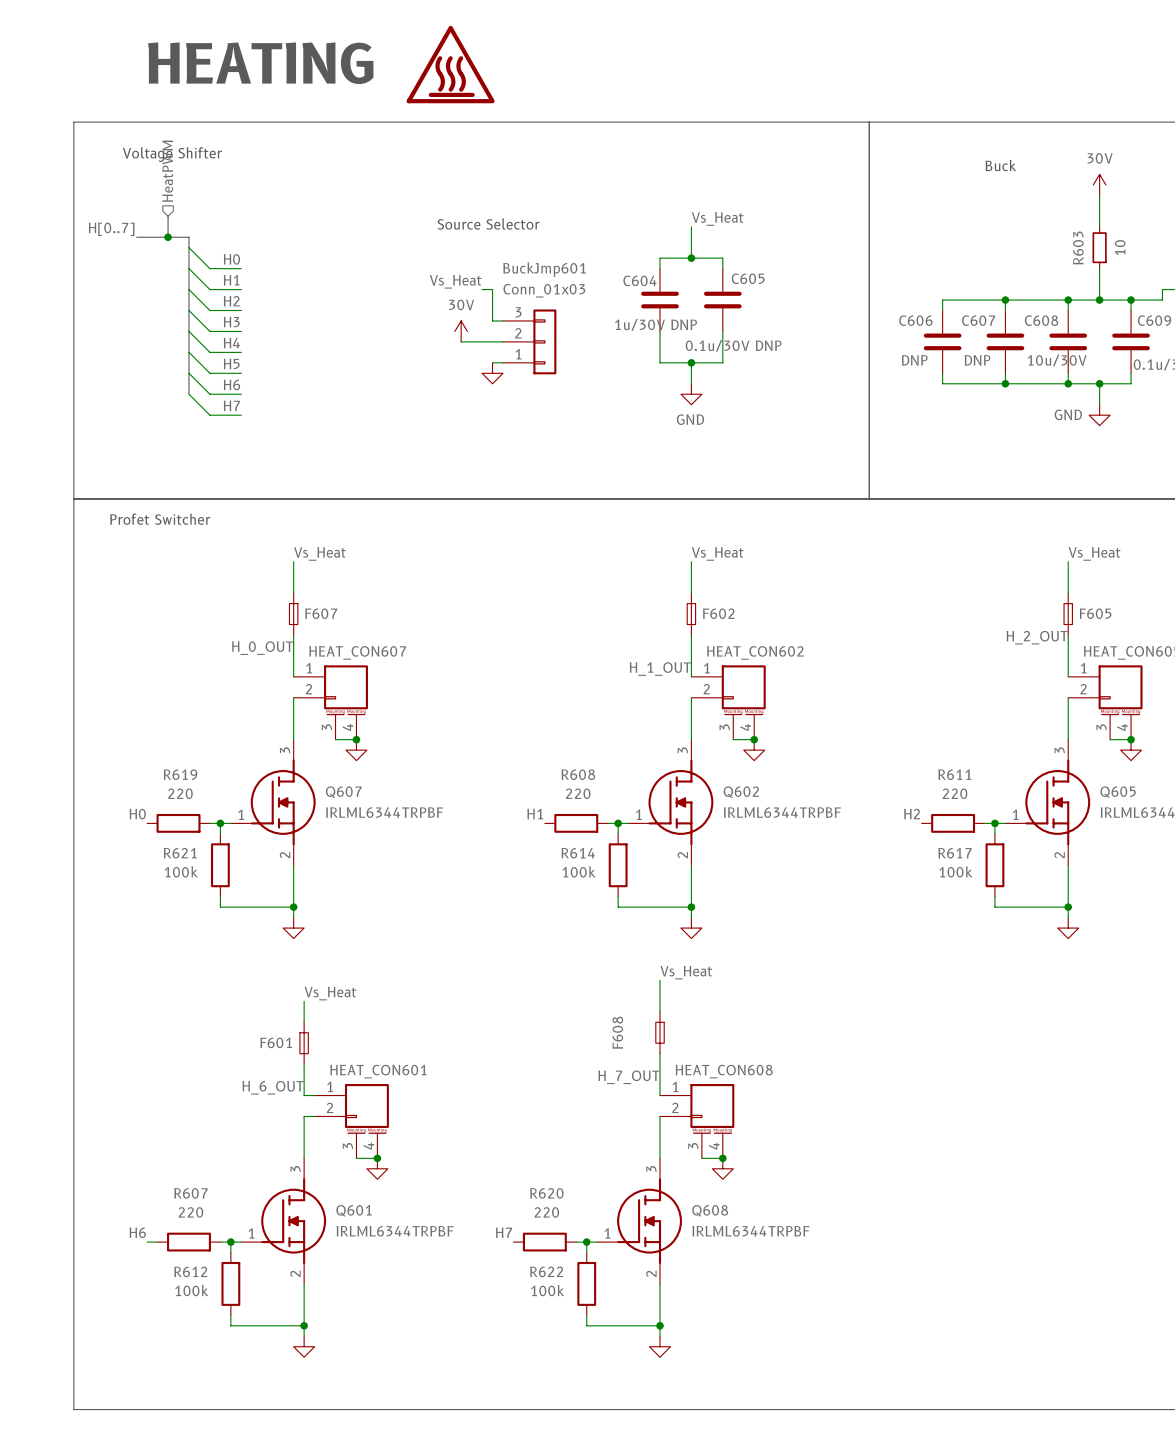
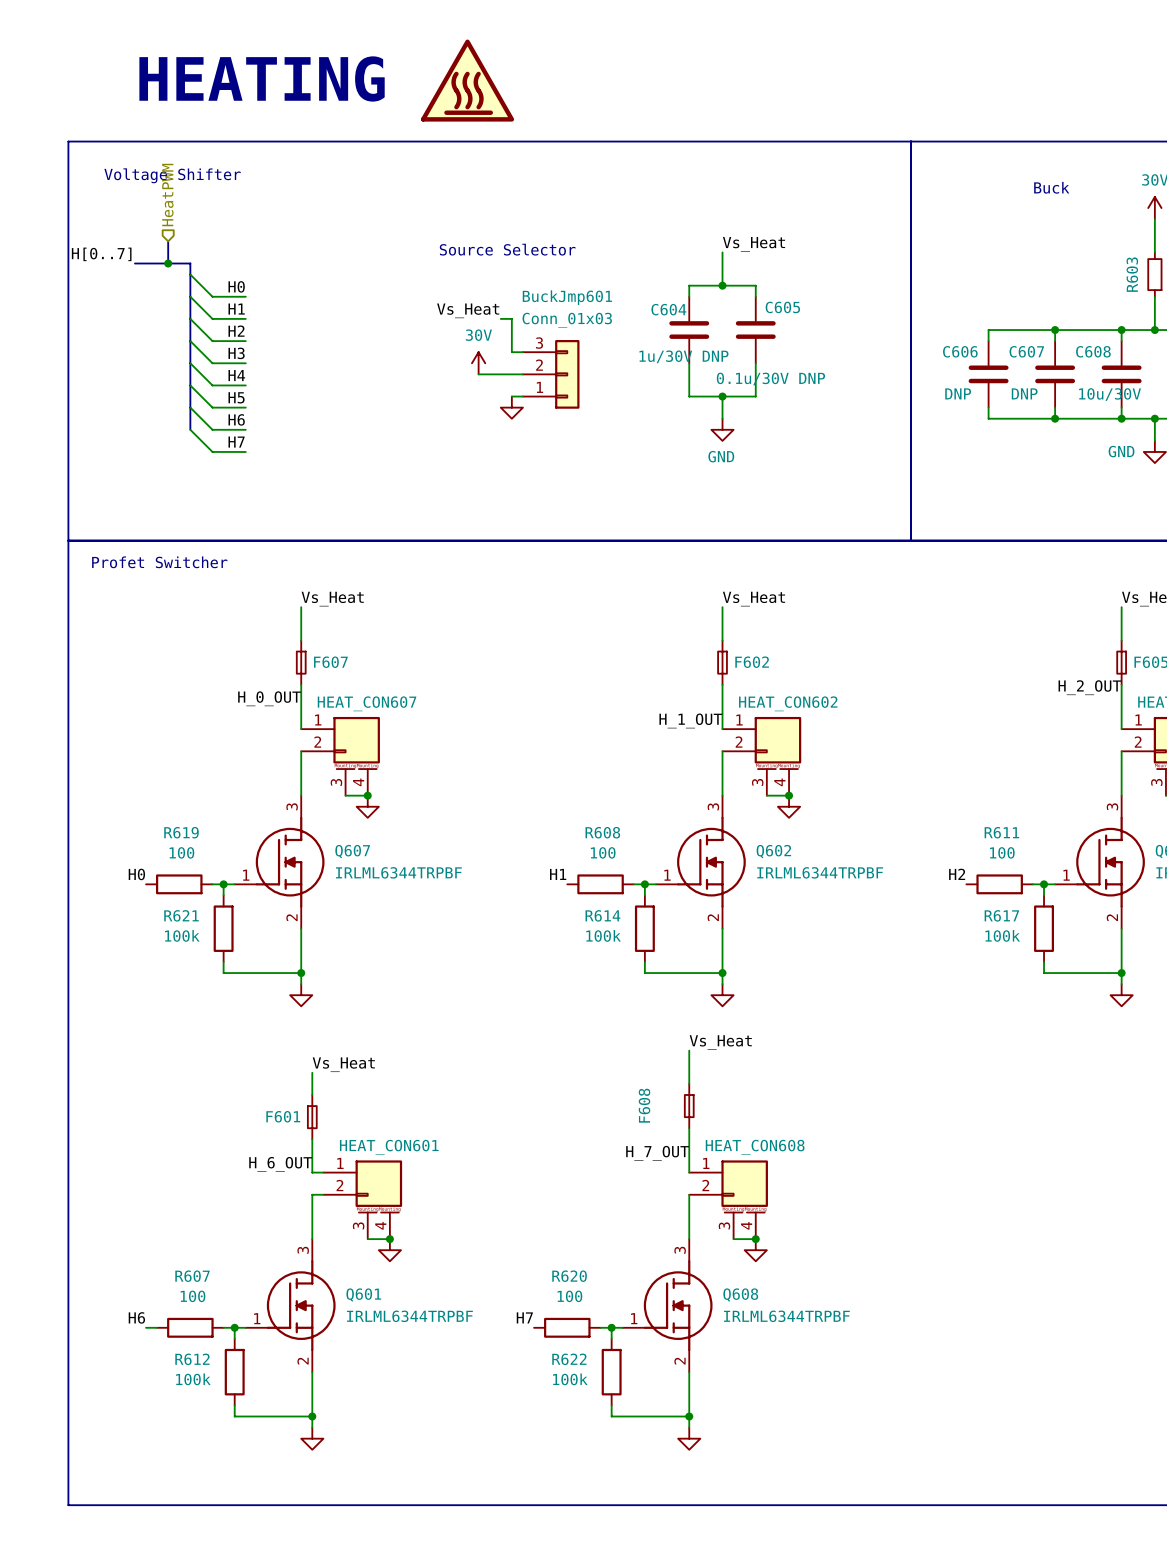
R619 value: 220 (180, 793) -> 100 (181, 852)
R608 value: 220 (578, 793) -> 100 (603, 852)
R611 value: 220 (955, 793) -> 100 (1002, 852)
R607 value: 220 (190, 1212) -> 100 (193, 1296)
R620 value: 220 (546, 1212) -> 100 (569, 1296)

